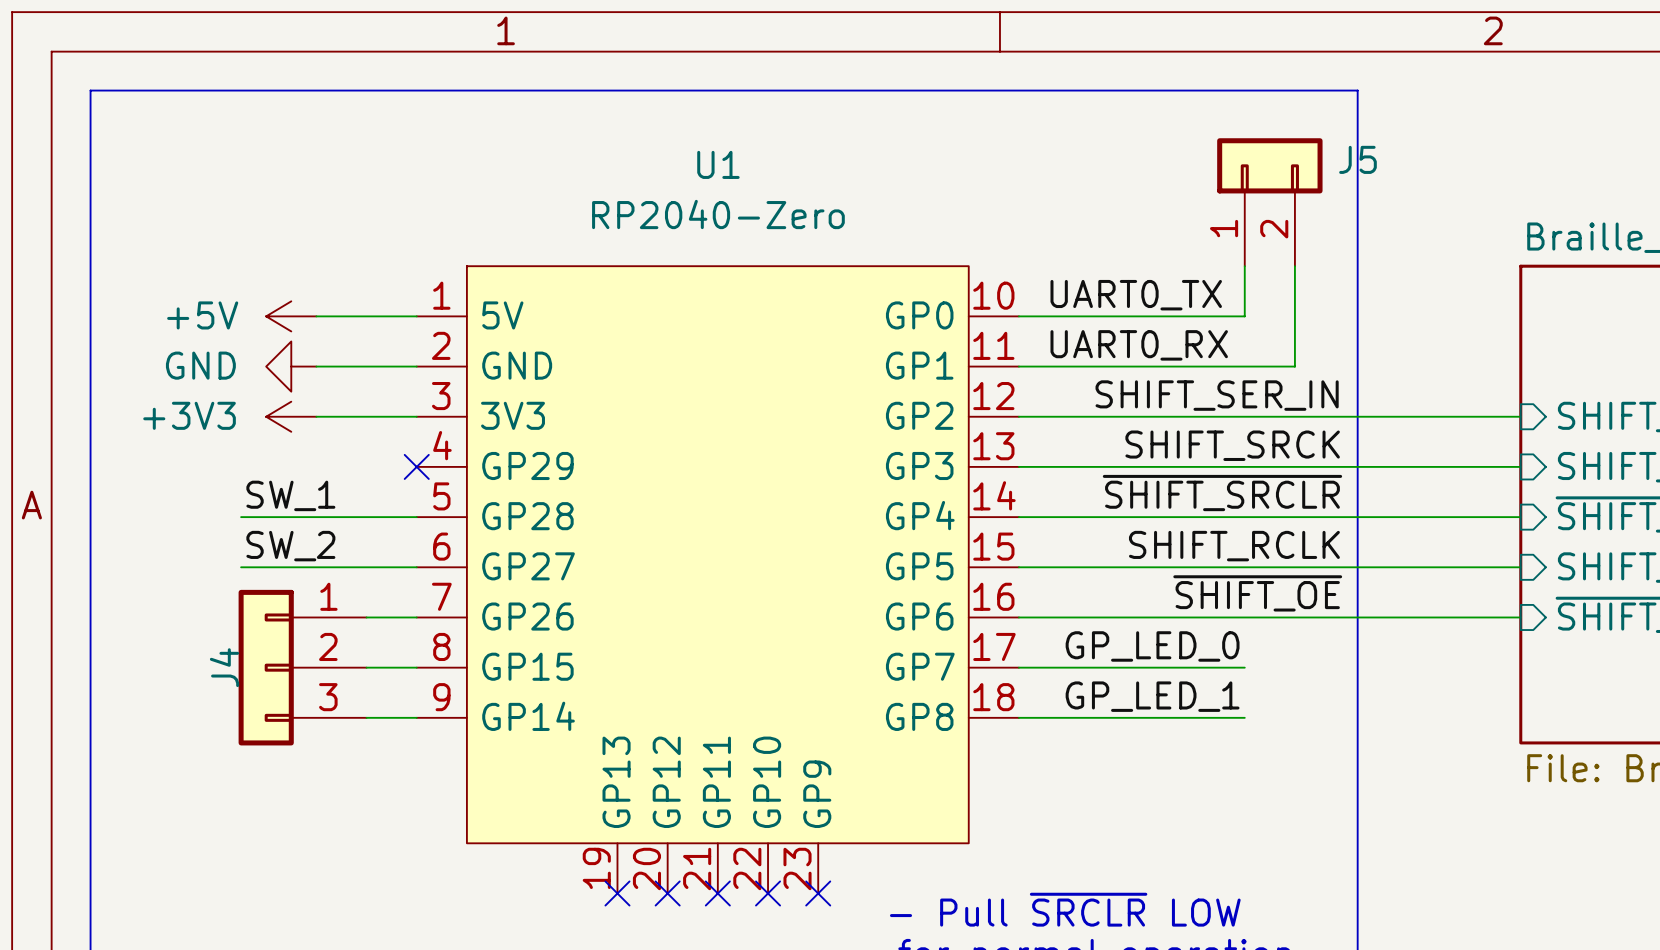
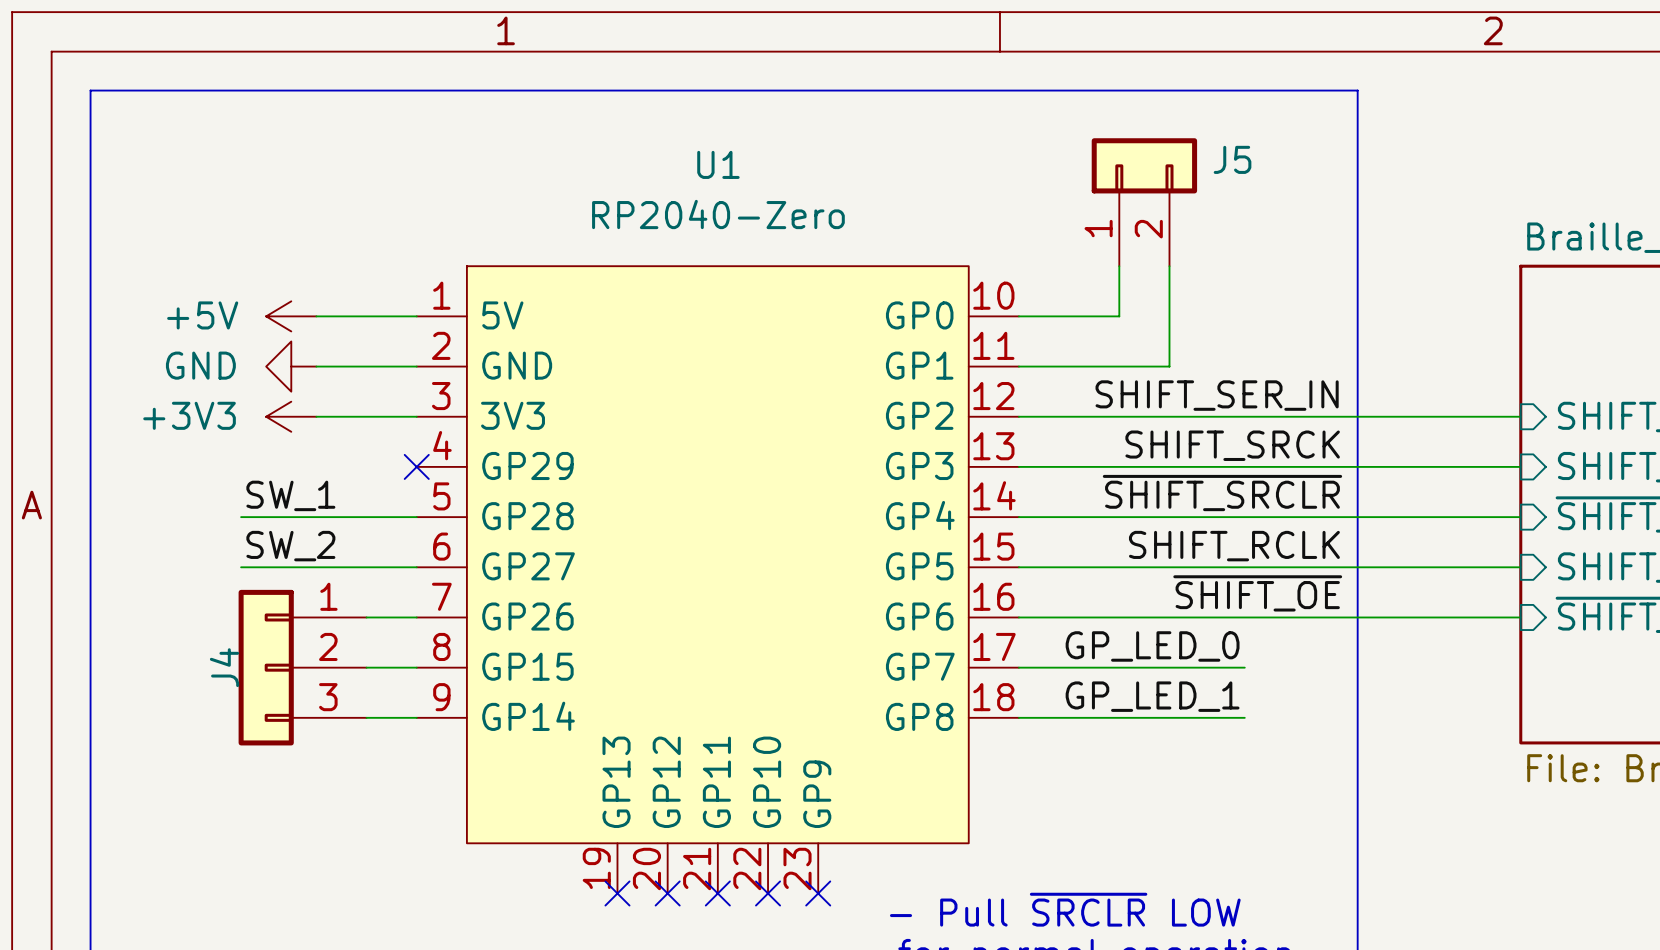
J5 position: (1269, 202) -> (1144, 202)
wire: (1244, 266) (1244, 316) (1119, 316) -> (1119, 266) (1119, 316)
wire: (1294, 266) (1294, 366) (1169, 366) -> (1169, 266) (1169, 366)
label: UART0_TX (1136, 295) -> none
label: UART0_RX (1139, 345) -> none

